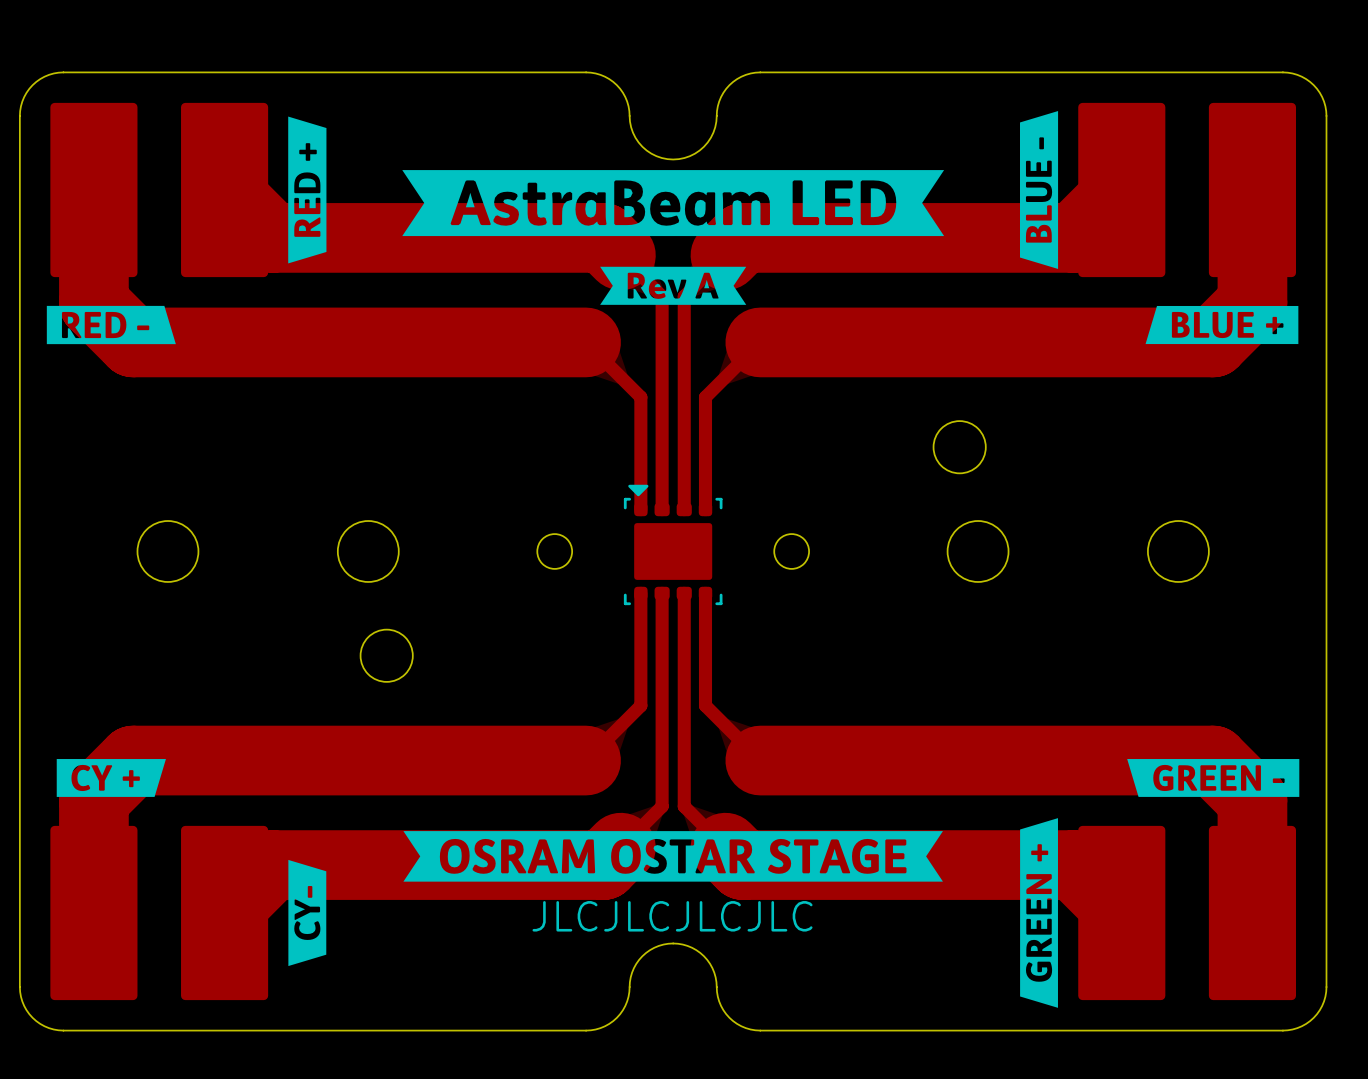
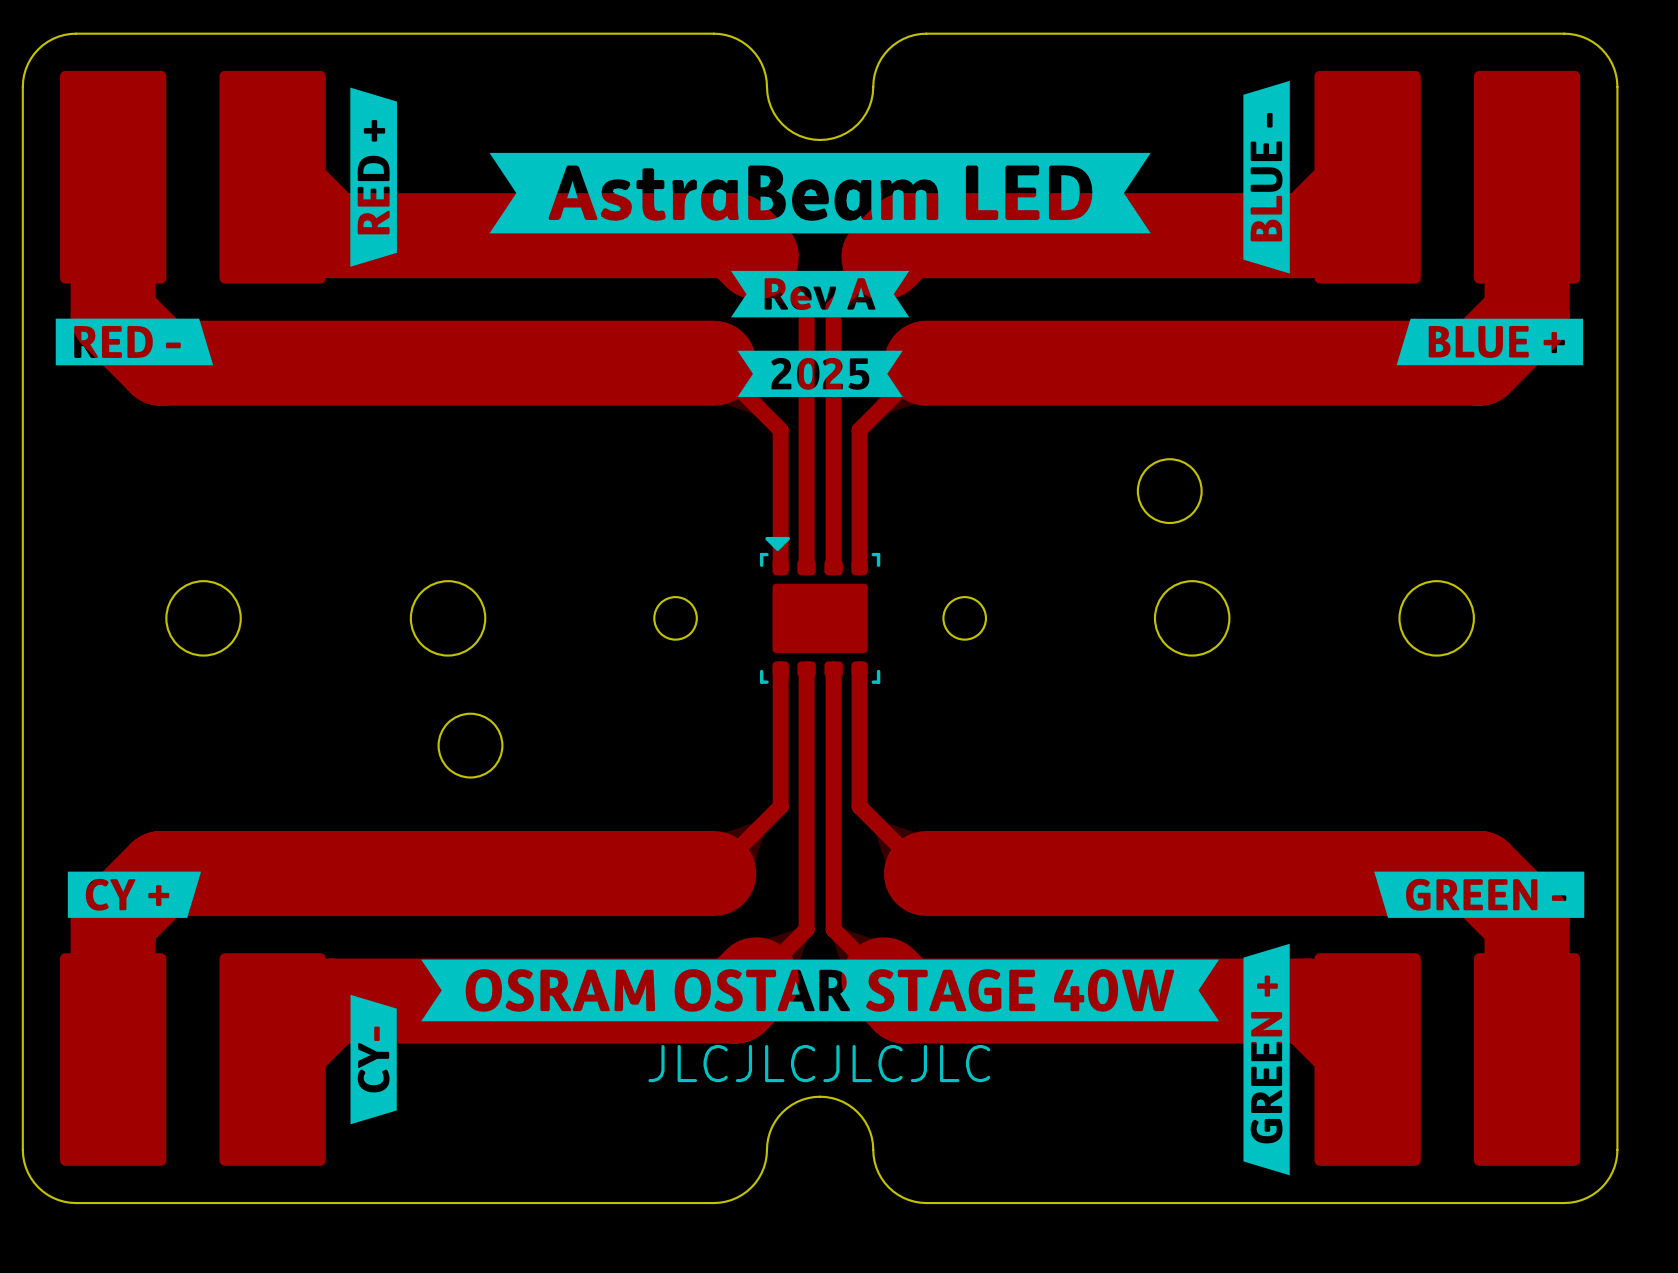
drawing: none -> [737, 350, 903, 397]
drawing shape: [403, 831, 943, 882] -> [421, 959, 1220, 1022]

